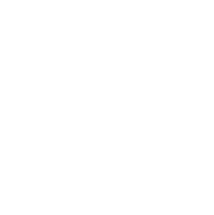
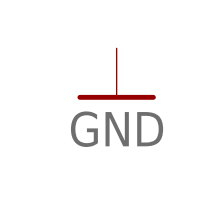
power symbol: none -> GND (116, 74)

